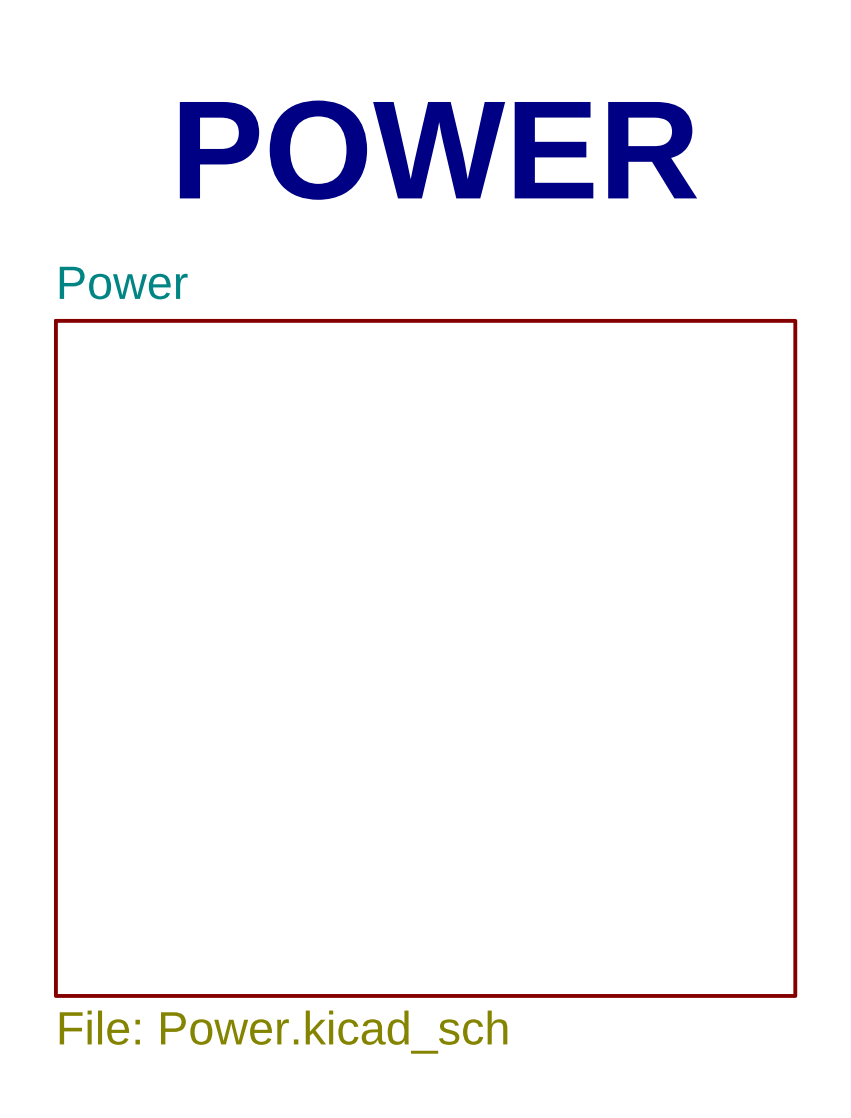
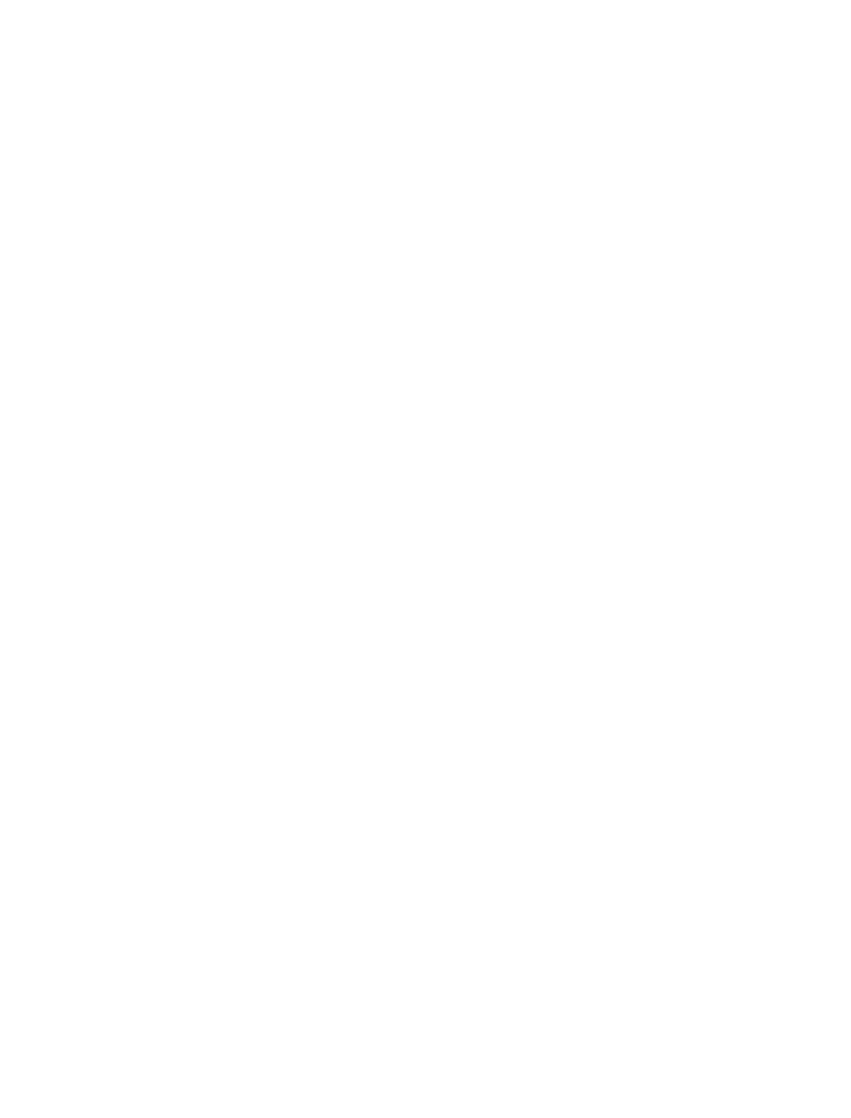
text: POWER (438, 150) -> none
sheet Power: File: Power.kicad_sch (425, 658) -> none

